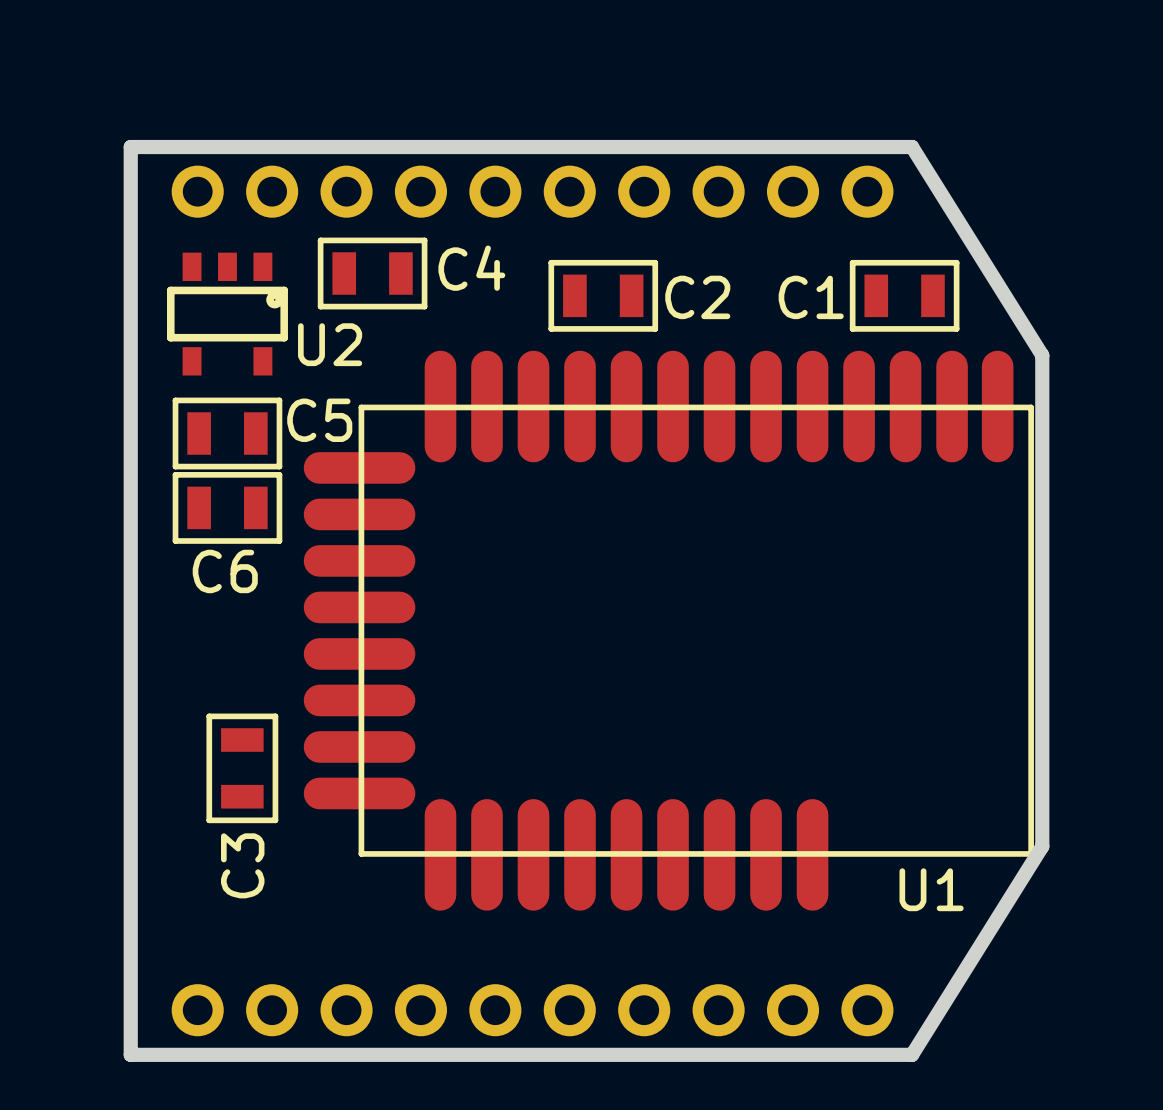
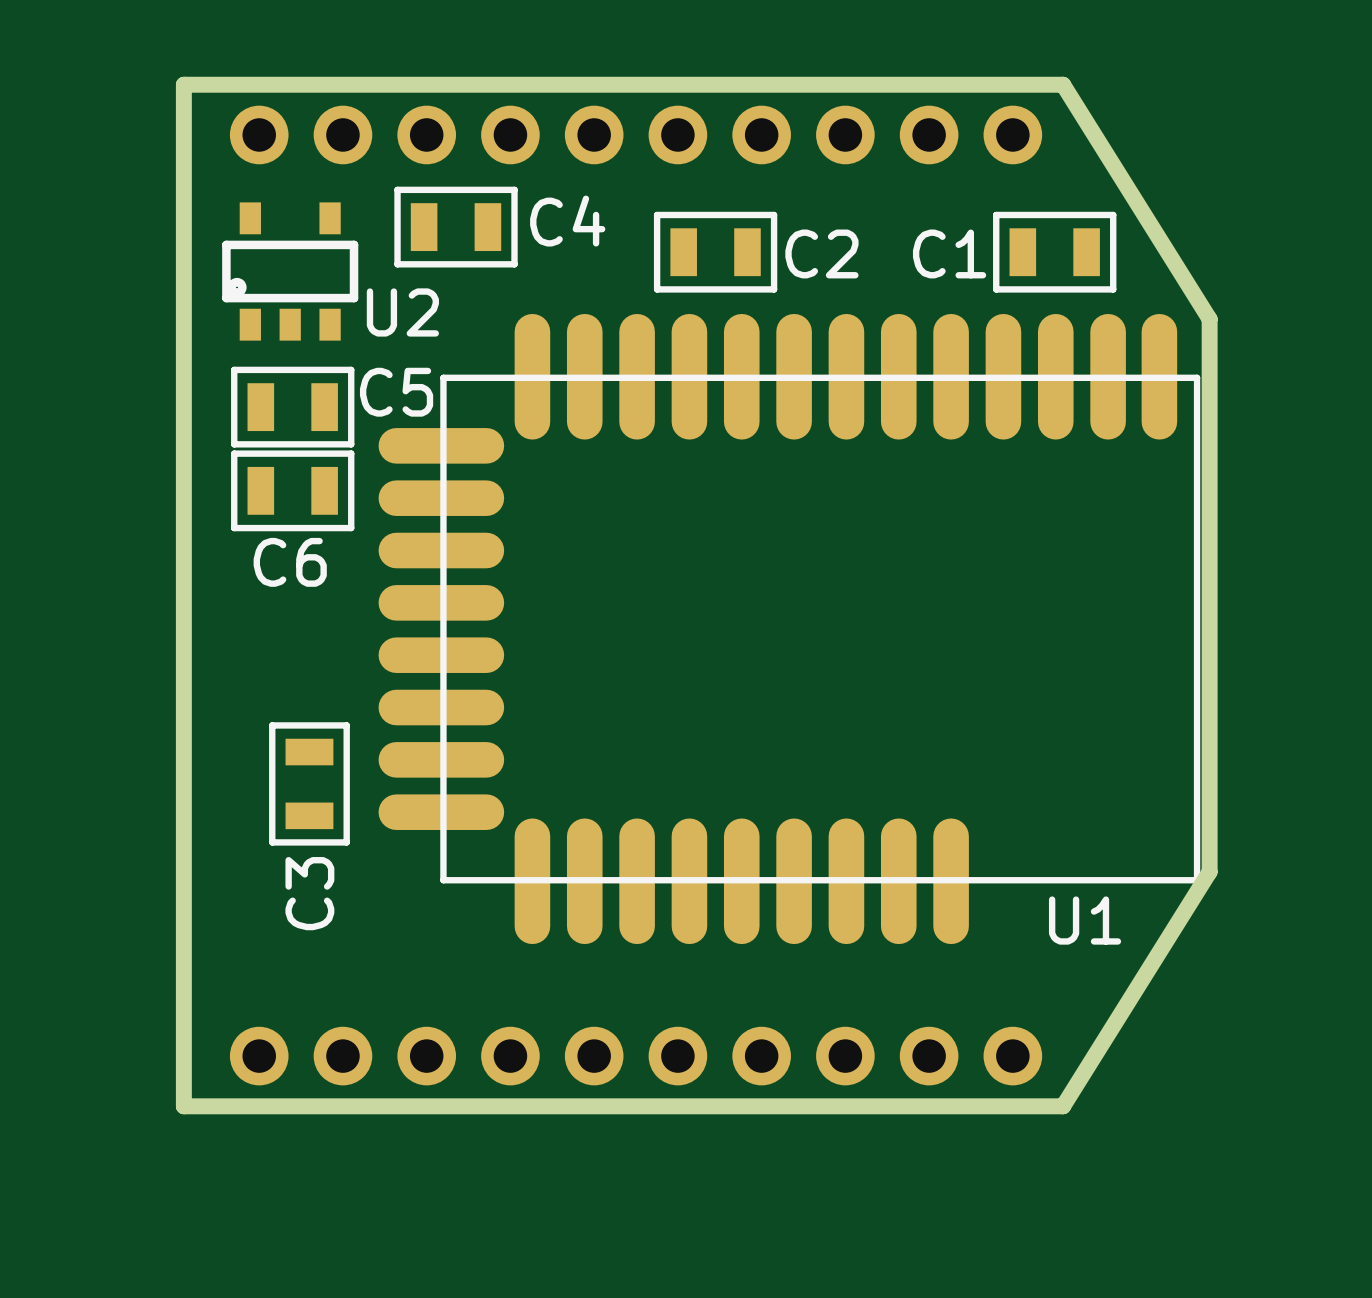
U2 rotation: 0° (227, 314) -> 180° (290, 271)

